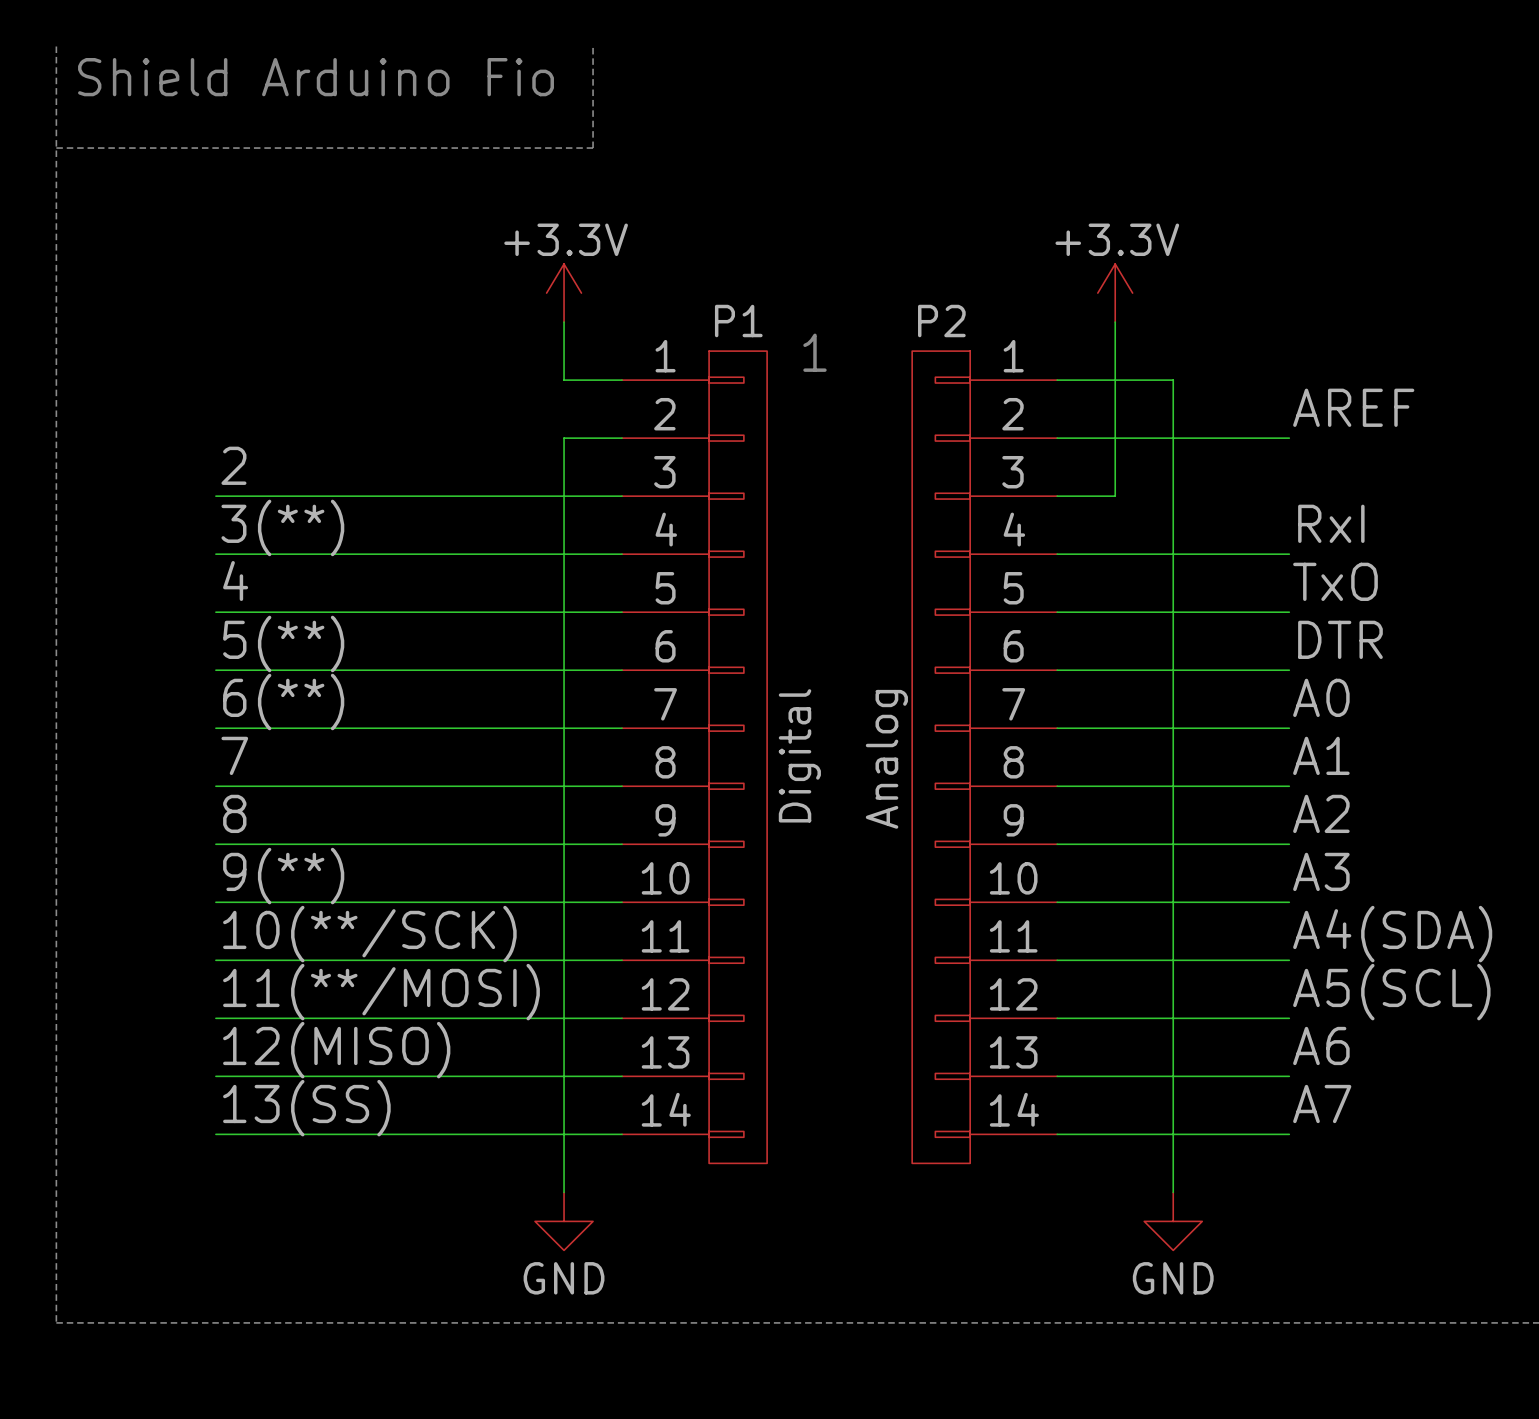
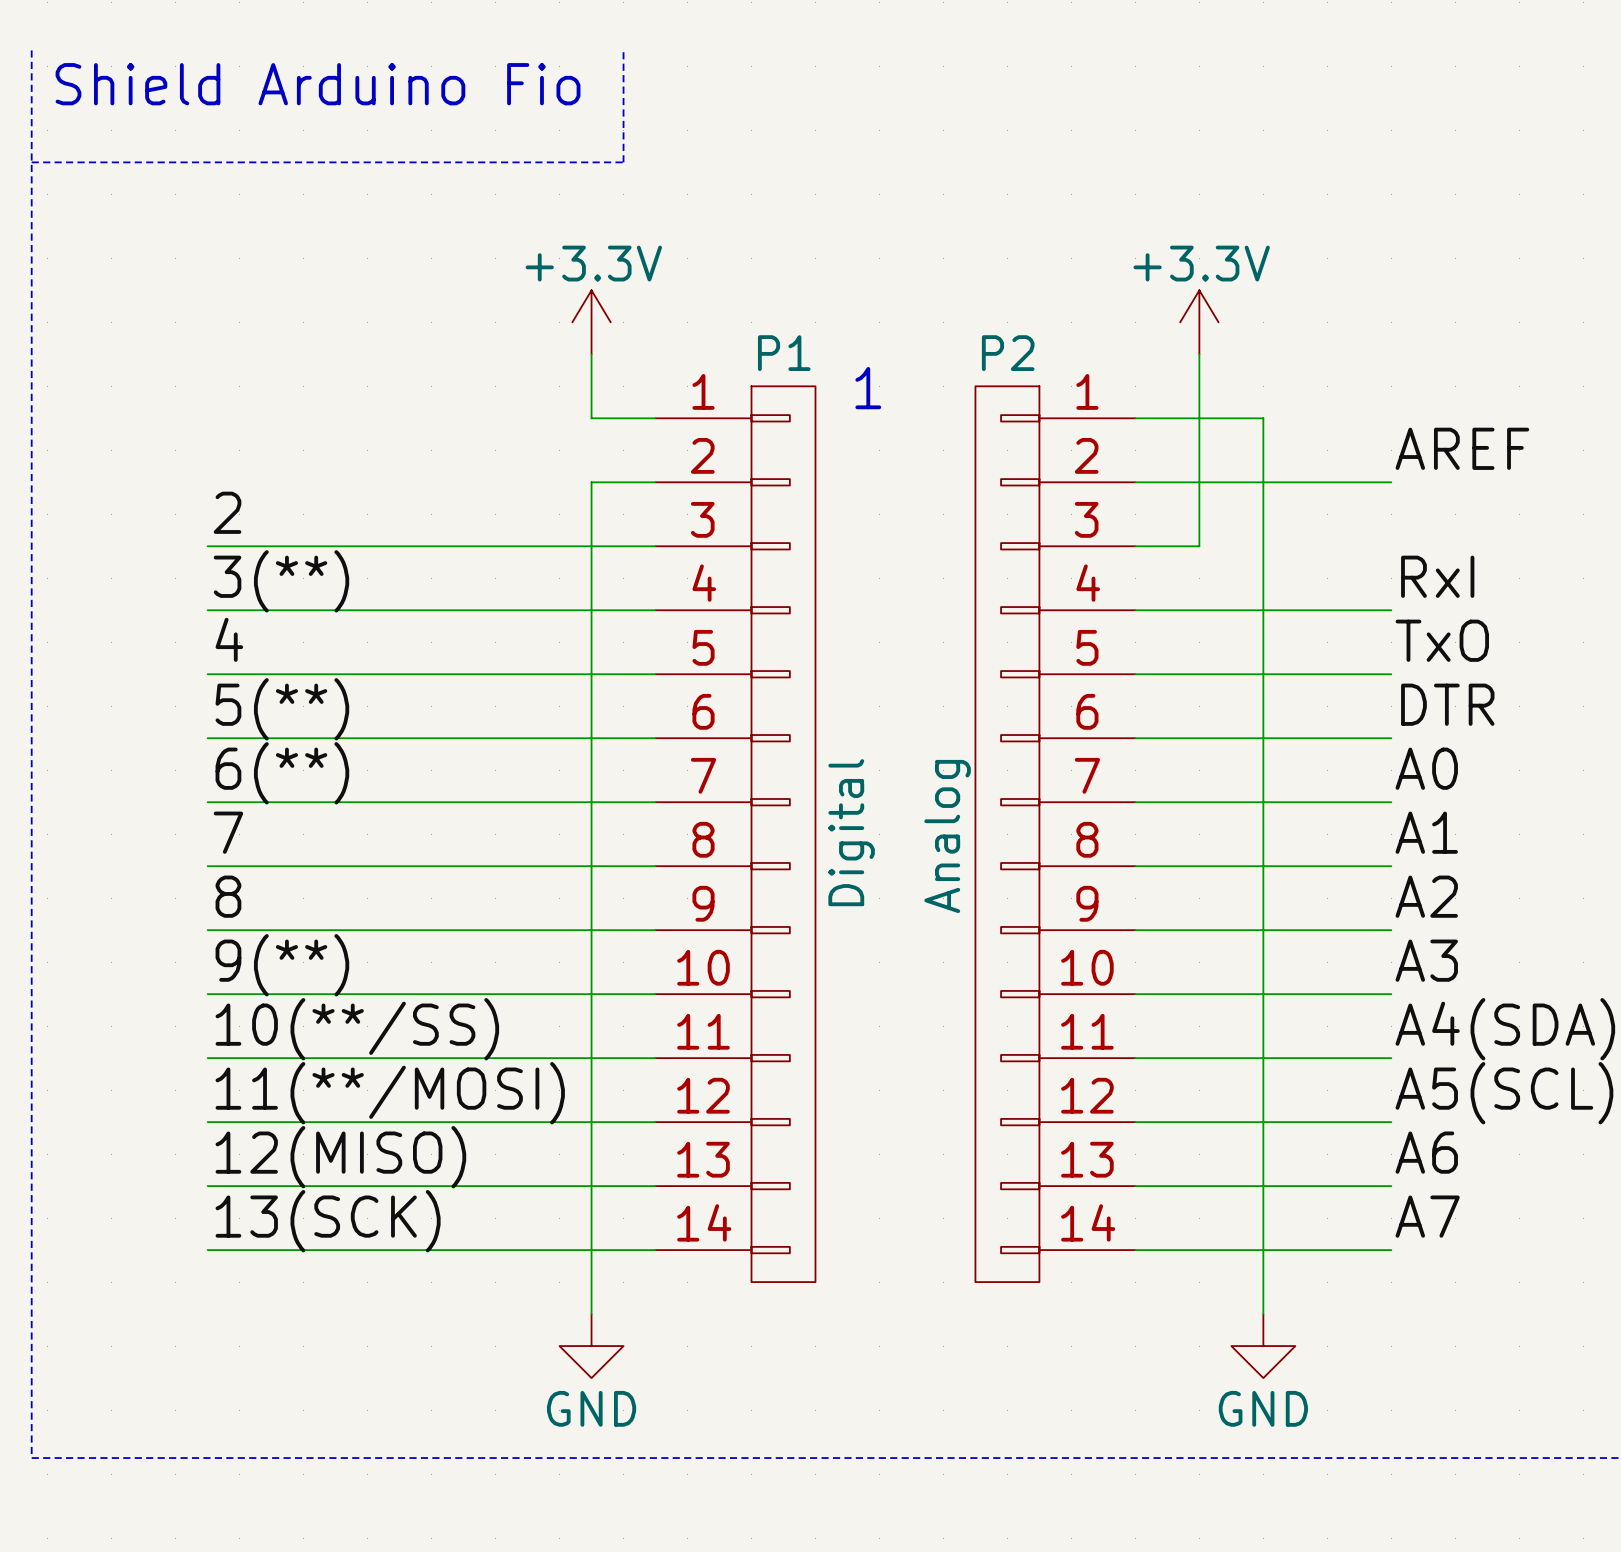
label: 10(**/SCK) (369, 934) -> 10(**/SS) (357, 1029)
label: 13(SS) (306, 1108) -> 13(SCK) (328, 1221)

